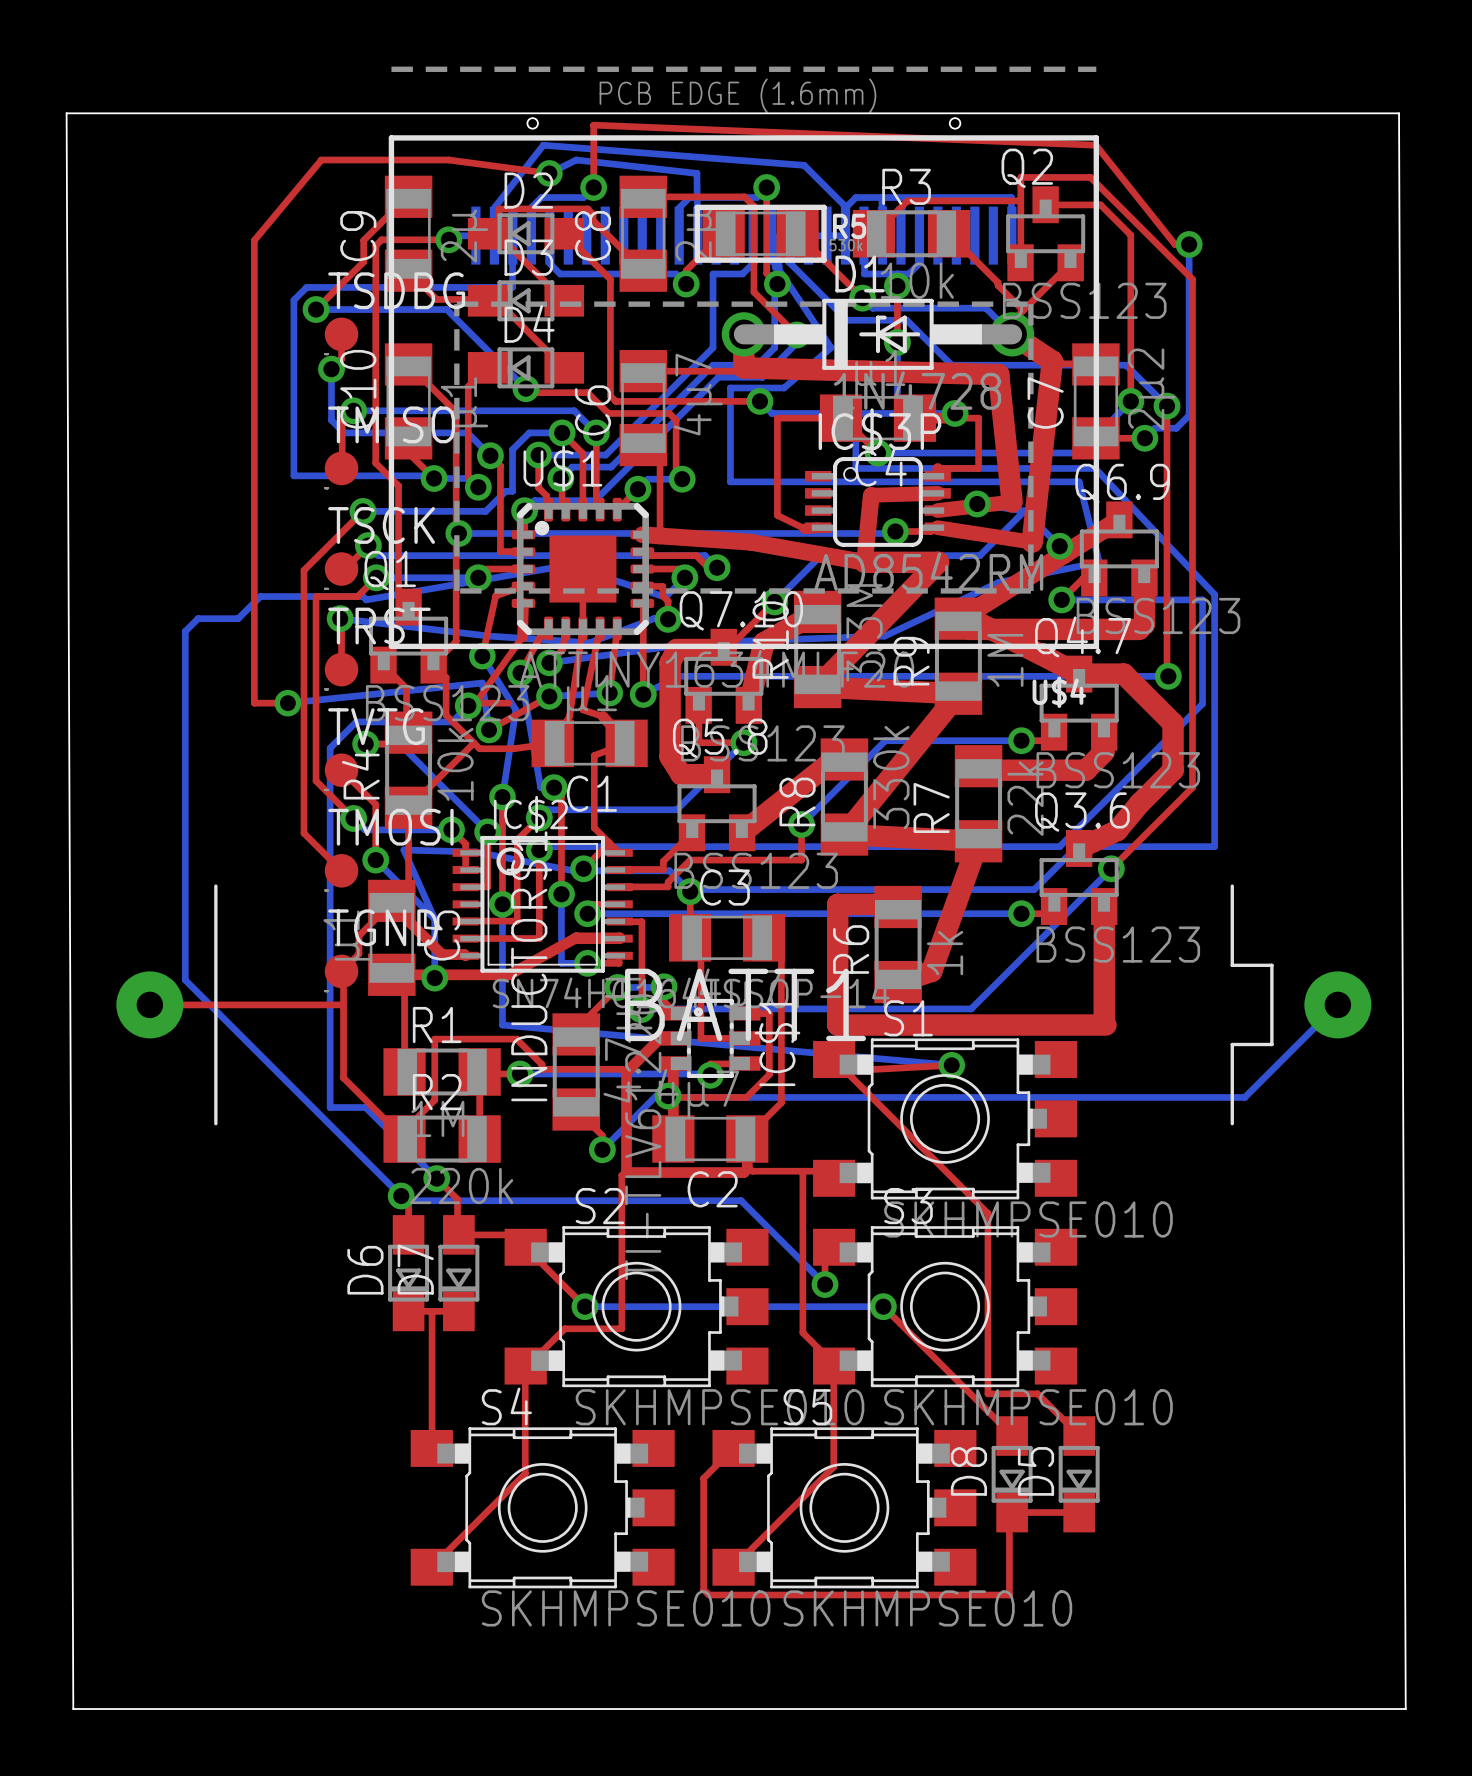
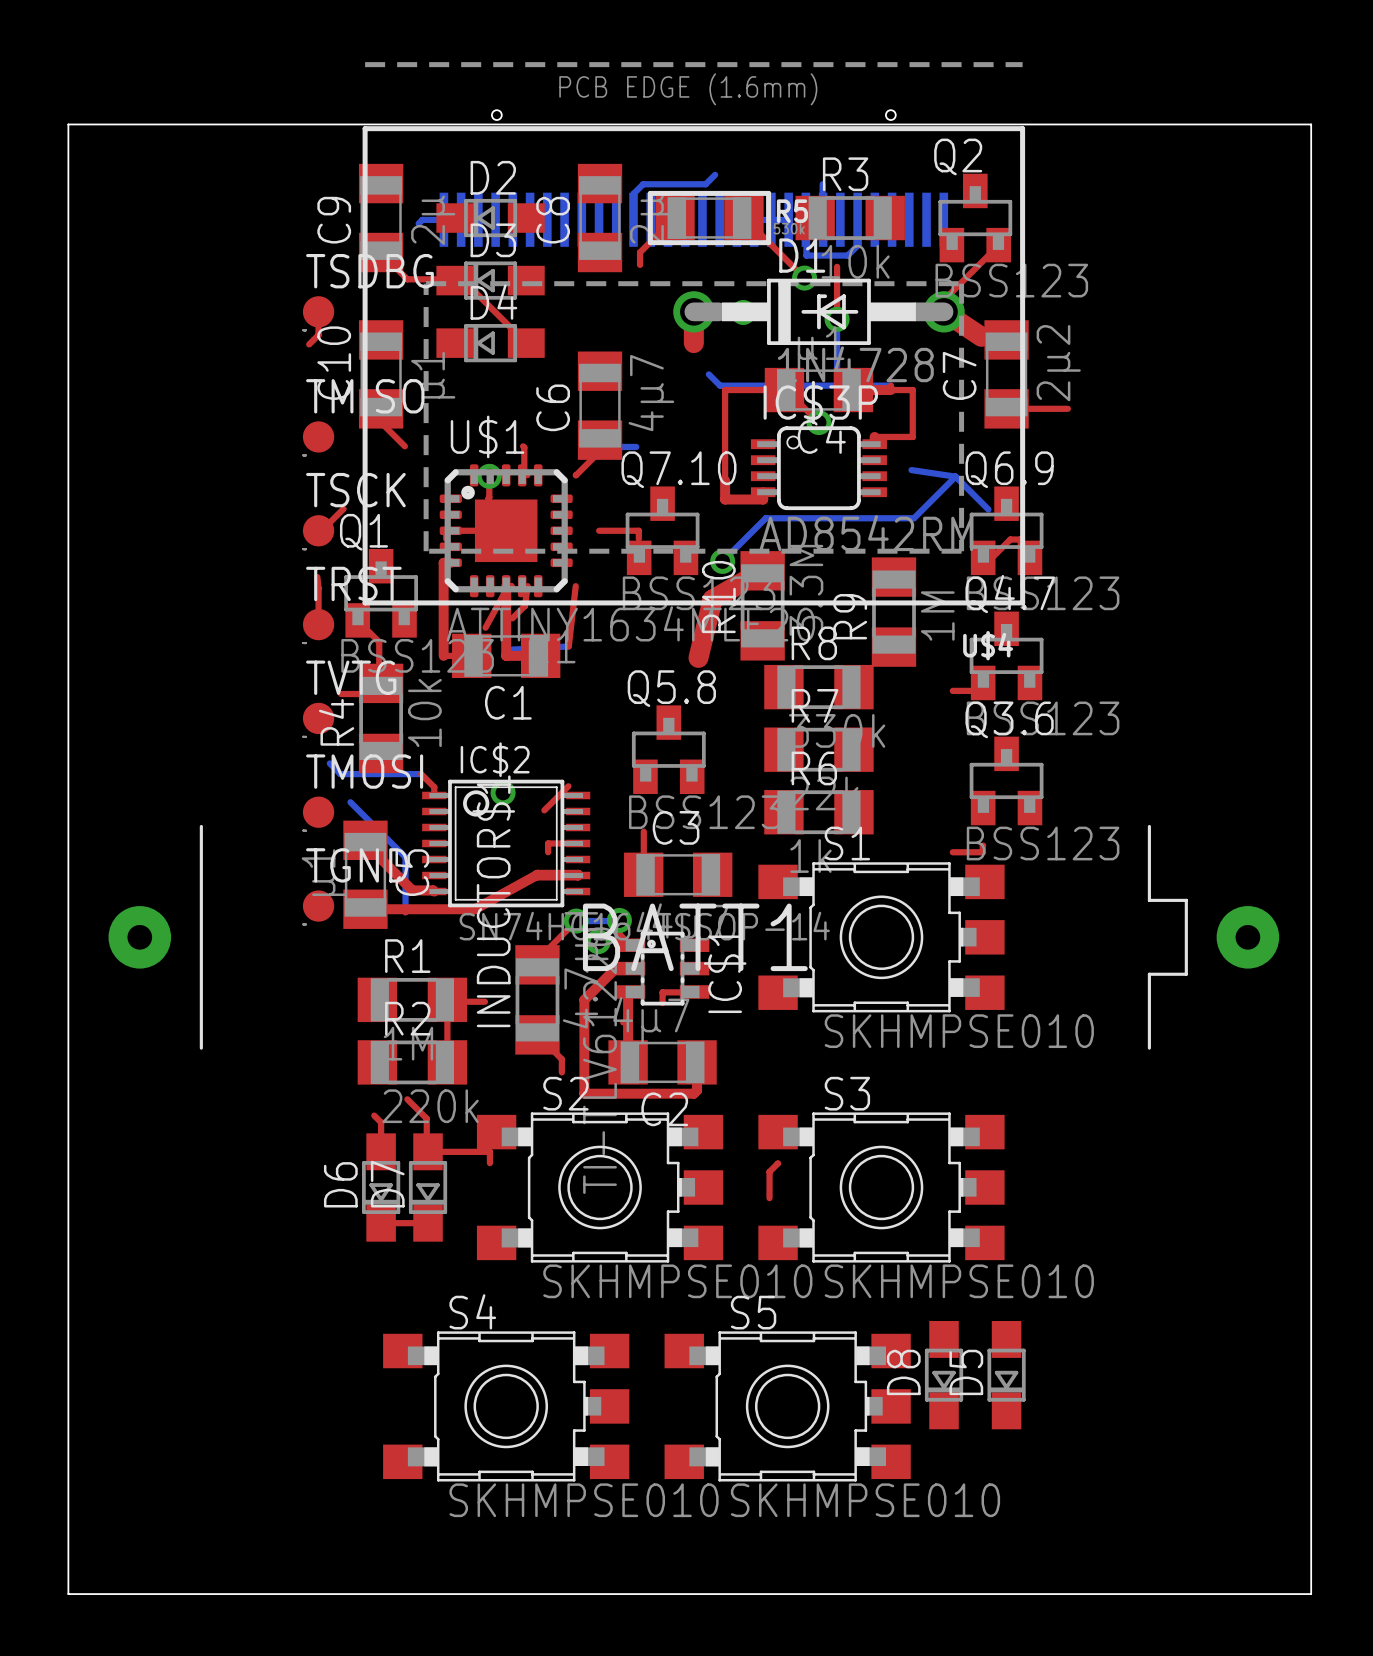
top track: (549, 173) (448, 159) (321, 159) (254, 240) (254, 703) (287, 703) -> none
bottom track: (549, 173) (576, 159) (696, 173) (697, 235) -> none
via: (549, 173) -> none
top track: (593, 187) (593, 125) (1095, 145) (1175, 244) (1189, 244) -> none
bottom track: (593, 187) (583, 197) (541, 197) (531, 206) (531, 235) -> none
via: (593, 187) -> none
top track: (766, 187) (766, 273) (777, 284) -> none
via: (766, 187) -> none
top track: (408, 196) (363, 240) (363, 261) (316, 309) -> none
top track: (643, 196) (744, 196) (753, 206) (753, 292) (796, 335) -> none
top track: (1020, 200) (907, 200) (873, 233) -> none
top track: (1045, 204) (1100, 204) (1130, 235) (1130, 401) -> none
bottom track: (846, 206) (855, 197) (1011, 197) (1011, 235) -> none
bottom track: (846, 206) (804, 165) (543, 145) (495, 206) (494, 235) (475, 235) -> none
top track: (564, 233) (610, 279) (610, 396) (615, 401) (759, 401) -> none
top track: (949, 233) (1023, 310) -> none
bottom track: (512, 235) (512, 287) (306, 287) (293, 300) (293, 475) (432, 475) (434, 478) (469, 478) (478, 487) -> none
bottom track: (550, 235) (550, 263) (560, 273) (676, 273) (686, 284) -> none
bottom track: (753, 235) (752, 263) (742, 273) (713, 273) (713, 347) (605, 455) (538, 455) -> none
bottom track: (771, 235) (777, 267) (831, 347) (784, 387) (730, 387) (730, 481) (1079, 481) (1099, 562) (998, 582) (884, 636) (696, 642) (549, 662) -> none
bottom track: (790, 235) (790, 263) (847, 320) (906, 320) (951, 365) (1126, 365) (1167, 406) -> none
top track: (448, 239) (381, 239) (375, 245) (375, 463) (398, 485) (398, 596) (408, 606) -> none
via: (448, 239) -> none
bottom track: (1189, 244) (1189, 415) (1176, 428) (1154, 428) (1144, 438) -> none
via: (1189, 244) -> none
top track: (1020, 262) (1020, 177) (1090, 177) (1192, 279) (1192, 787) (1111, 868) -> none
top track: (643, 270) (593, 220) (593, 214) (587, 208) (499, 208) (499, 231) (487, 233) (497, 233) (564, 300) -> none
via: (686, 284) -> none
bottom track: (777, 284) (774, 284) (774, 347) (757, 365) (713, 365) (611, 467) (572, 467) (560, 478) -> none
via: (777, 284) -> none
via: (897, 286) -> none
bottom track: (862, 298) (872, 308) (985, 308) (1012, 334) -> none
bottom track: (316, 309) (446, 309) (525, 388) -> none
via: (316, 309) -> none
bottom track: (796, 335) (796, 343) (762, 377) (718, 377) (595, 500) (534, 500) (524, 510) -> none
top track: (1052, 361) (1032, 542) (937, 527) (930, 531) (895, 531) -> none
top track: (408, 364) (456, 412) (456, 641) (433, 665) (446, 677) (446, 715) (479, 748) (513, 748) (552, 743) (569, 716) (582, 628) (582, 569) -> none
top track: (487, 367) (468, 386) (468, 477) (478, 487) -> none
bottom track: (331, 369) (331, 420) (344, 432) (467, 432) (490, 455) -> none
via: (331, 369) -> none
top track: (643, 371) (733, 371) (743, 367) (998, 374) (1012, 501) (937, 510) -> none
top track: (525, 388) (525, 392) (587, 392) (608, 413) (669, 413) (676, 420) (676, 473) (682, 479) -> none
via: (525, 388) -> none
via: (759, 401) -> none
C7 position: (1095, 401) -> (1006, 374)
bottom track: (1130, 401) (1079, 453) (877, 453) -> none
via: (1130, 401) -> none
top track: (1167, 406) (1168, 676) -> none
via: (1167, 406) -> none
C6 position: (643, 408) -> (600, 405)
top track: (353, 410) (342, 422) (341, 468) -> none
bottom track: (353, 410) (574, 410) (596, 432) -> none
via: (353, 410) -> none
bottom track: (855, 413) (855, 468) (1095, 468) (1214, 594) (1214, 846) (1077, 846) (1034, 889) (692, 889) (690, 891) (669, 870) (586, 870) (583, 868) (580, 872) (475, 852) (403, 850) (434, 919) -> none
via: (955, 413) -> none
top track: (562, 432) (582, 453) (582, 509) -> none
bottom track: (562, 432) (529, 432) (512, 449) (512, 491) (505, 491) (485, 511) (362, 511) -> none
via: (562, 432) -> none
top track: (596, 432) (596, 506) (599, 509) -> none
via: (596, 432) -> none
via: (1144, 438) -> none
top track: (643, 445) (660, 462) (659, 535) -> none
top track: (490, 455) (500, 465) (500, 551) (523, 551) -> none
via: (490, 455) -> none
top track: (538, 455) (538, 487) (546, 495) (546, 508) (548, 509) -> none
via: (538, 455) -> none
via: (434, 478) -> none
via: (560, 478) -> none
via: (682, 479) -> none
via: (478, 487) -> none
via: (637, 489) -> none
top track: (937, 493) (871, 495) (864, 562) -> none
via: (977, 504) -> none
top track: (362, 511) (303, 570) (303, 833) (341, 870) -> none
via: (362, 511) -> none
top track: (777, 515) (804, 528) (818, 527) -> (725, 480) (725, 499) (763, 499) (763, 492)
top track: (1119, 519) (965, 615) (1079, 674) (1123, 674) (1173, 723) (1173, 770) (1139, 803) (1117, 830) (1079, 848) -> none
bottom track: (895, 531) (893, 533) (458, 533) -> none
via: (895, 531) -> none
via: (458, 533) -> none
top track: (642, 534) (750, 542) (864, 562) -> none
bottom track: (368, 545) (378, 555) (704, 555) (717, 567) -> none
via: (368, 545) -> none
via: (1059, 546) -> none
Q6.9 position: (1119, 548) -> (1006, 530)
top track: (642, 552) (647, 552) (651, 555) (696, 555) (708, 567) (717, 567) -> none
top track: (864, 562) (938, 562) (817, 687) (958, 693) (844, 834) (978, 841) (931, 971) (898, 982) -> none
via: (717, 567) -> none
U$1 position: (582, 569) -> (506, 530)
top track: (376, 577) (357, 596) (316, 596) (316, 780) (353, 818) -> none
bottom track: (376, 577) (478, 577) -> none
via: (376, 577) -> none
via: (478, 577) -> none
bottom track: (684, 577) (665, 597) (564, 563) (561, 566) (366, 599) (362, 596) (260, 596) (238, 618) (198, 618) (185, 631) (185, 980) (406, 1200) (741, 1200) (825, 1284) -> none
via: (684, 577) -> none
top track: (1144, 577) (1144, 624) (1139, 629) (969, 629) (958, 618) -> none
top track: (523, 586) (495, 595) (482, 656) -> none
top track: (642, 586) (662, 586) (662, 595) (668, 601) (668, 619) -> none
bottom track: (1061, 599) (1202, 599) (1202, 703) (1059, 846) (542, 846) (539, 850) -> none
via: (1061, 599) -> none
top track: (774, 601) (731, 644) (721, 649) (676, 649) (670, 662) (670, 756) (681, 774) (717, 774) -> none
top track: none -> (450, 562) (443, 562) (443, 655)
top track: (523, 603) (522, 636) (475, 703) (468, 705) -> none
top track: (642, 603) (643, 694) -> none
bottom track: (340, 618) (489, 636) (589, 642) (654, 618) (668, 619) -> none
via: (340, 618) -> none
via: (668, 619) -> none
top track: none -> (506, 586) (506, 655) (540, 655)
top track: (600, 628) (582, 709) (603, 716) (626, 743) (594, 755) (594, 827) (619, 852) -> none
bottom track: (482, 656) (515, 709) (502, 797) -> none
via: (482, 656) -> none
via: (549, 662) -> none
bottom track: (520, 672) (540, 787) (554, 787) -> none
via: (520, 672) -> none
Q7.10 position: (723, 676) -> (662, 530)
bottom track: (1168, 676) (678, 676) (643, 694) -> none
via: (1168, 676) -> none
via: (609, 693) -> none
via: (643, 694) -> none
top track: (549, 696) (489, 729) -> none
via: (549, 696) -> none
bottom track: (287, 703) (482, 683) (489, 729) -> none
via: (287, 703) -> none
bottom track: (468, 705) (452, 721) (356, 721) (330, 748) (330, 1107) (365, 1107) (436, 1178) -> none
via: (468, 705) -> none
top track: (698, 705) (698, 742) (743, 742) -> none
via: (489, 729) -> none
top track: (1104, 732) (1104, 751) (1085, 770) (982, 770) (978, 766) -> none
bottom track: (1021, 740) (885, 740) (801, 824) -> none
via: (1021, 740) -> none
bottom track: (743, 742) (676, 809) (547, 809) (539, 817) -> none
via: (743, 742) -> none
top track: (473, 743) (408, 807) (408, 895) (391, 900) (358, 935) (358, 953) (341, 971) (343, 974) (343, 1078) (404, 1139) (402, 1132) (434, 1100) (434, 1039) (516, 1039) (542, 1064) (542, 1069) (621, 1069) (626, 1071) -> none
C1 position: (589, 743) -> (506, 655)
bottom track: (365, 744) (399, 744) (487, 831) -> none
via: (365, 744) -> none
top track: (844, 759) (837, 756) (742, 832) -> none
top track: (341, 770) (375, 804) (375, 860) -> none
top track: (554, 787) (561, 795) (561, 894) -> none
via: (554, 787) -> none
top track: (502, 797) (502, 904) -> none
via: (502, 797) -> none
R8 rotation: 0° (844, 797) -> 90° clockwise (818, 687)
R7 rotation: 0° (978, 803) -> 90° clockwise (818, 749)
R7 position: (978, 803) -> (818, 749)
top track: (539, 817) (517, 839) (517, 921) (465, 921) -> none
via: (539, 817) -> none
via: (353, 818) -> none
top track: (801, 824) (801, 860) (690, 860) (668, 882) (668, 886) (619, 886) -> none
via: (801, 824) -> none
via: (451, 829) -> none
top track: (487, 831) (487, 886) (465, 887) -> none
via: (487, 831) -> none
top track: (691, 832) (663, 861) (663, 869) (619, 870) -> none
top track: (539, 850) (539, 938) (465, 938) -> none
top track: (465, 852) (465, 870) -> none
via: (375, 860) -> none
via: (583, 868) -> none
bottom track: (1111, 868) (971, 1008) (641, 1009) -> none
via: (1111, 868) -> none
Q3.6 position: (1079, 877) -> (1006, 780)
via: (690, 891) -> none
bottom track: (561, 894) (561, 963) (587, 963) -> none
via: (561, 894) -> none
bottom track: (502, 904) (502, 1025) (951, 1065) -> none
via: (502, 904) -> none
top track: (1104, 906) (1104, 1023) (1105, 1025) (837, 1025) (837, 904) (895, 904) (898, 907) -> none
bottom track: (587, 913) (1021, 913) -> none
via: (587, 913) -> none
via: (1021, 913) -> none
top track: (619, 921) (641, 921) (641, 1009) -> none
top track: (690, 937) (700, 948) (700, 1038) (744, 1038) -> none
top track: (764, 937) (781, 954) (781, 1102) (747, 1139) -> none
R6 rotation: 0° (898, 944) -> 90° clockwise (818, 812)
R6 position: (898, 944) -> (818, 812)
top track: (619, 955) (619, 963) (587, 963) -> none
via: (587, 963) -> none
top track: (391, 974) (404, 980) (404, 1071) -> none
via: (434, 978) -> none
top track: (149, 1004) (343, 1004) -> none
bottom track: (1337, 1004) (1244, 1097) (656, 1096) (602, 1149) -> none
top track: (744, 1013) (769, 1013) (769, 1074) (746, 1097) (673, 1097) -> none
top track: (834, 1059) (987, 1213) (987, 1393) (1037, 1393) (1079, 1436) -> none
top track: (951, 1065) (845, 1070) -> none
via: (951, 1065) -> none
bottom track: (519, 1073) (710, 1075) -> none
via: (519, 1073) -> none
via: (710, 1075) -> none
via: (668, 1096) -> none
S1 position: (945, 1118) -> (881, 937)
via: (602, 1149) -> none
top track: (747, 1169) (752, 1171) (833, 1171) (834, 1178) -> none
top track: (802, 1171) (802, 1332) (834, 1366) -> none
top track: (626, 1172) (621, 1175) (621, 1328) (564, 1328) (525, 1366) -> none
via: (436, 1178) -> none
via: (401, 1196) -> none
top track: (525, 1247) (584, 1306) -> none
via: (825, 1284) -> none
bottom track: (584, 1306) (883, 1306) -> none
via: (584, 1306) -> none
S2 position: (636, 1306) -> (600, 1187)
top track: (883, 1306) (1012, 1436) -> none
via: (883, 1306) -> none
S3 position: (945, 1306) -> (881, 1187)
top track: (432, 1311) (432, 1448) -> none
top track: (525, 1366) (525, 1473) (432, 1566) -> none
top track: (833, 1366) (833, 1466) (733, 1566) -> none
top track: (733, 1448) (703, 1478) (703, 1589) (709, 1595) (1009, 1595) (1009, 1514) (1012, 1512) (1079, 1512) -> none
board edge: (73, 1709) (66, 113) (1399, 113) (1405, 1709) -> (68, 1594) (68, 124) (1311, 124) (1311, 1594)

